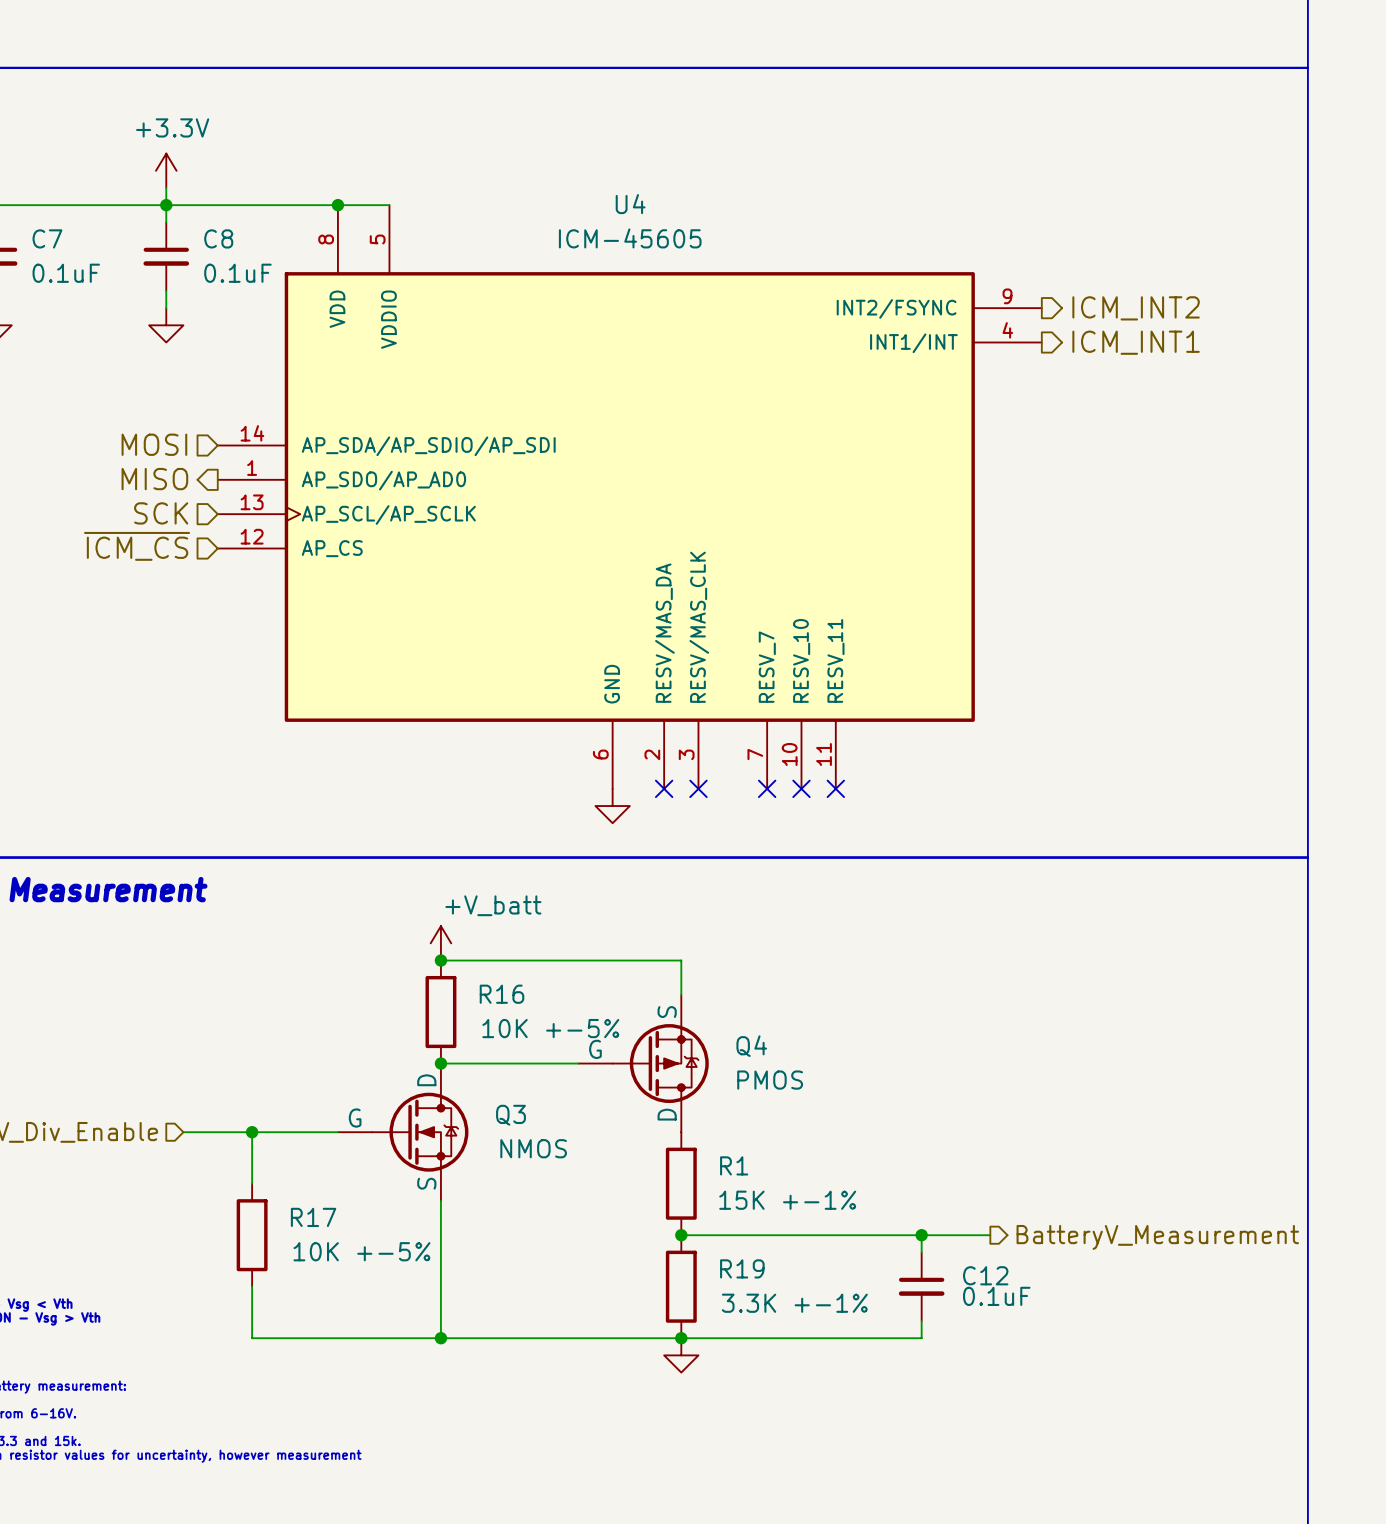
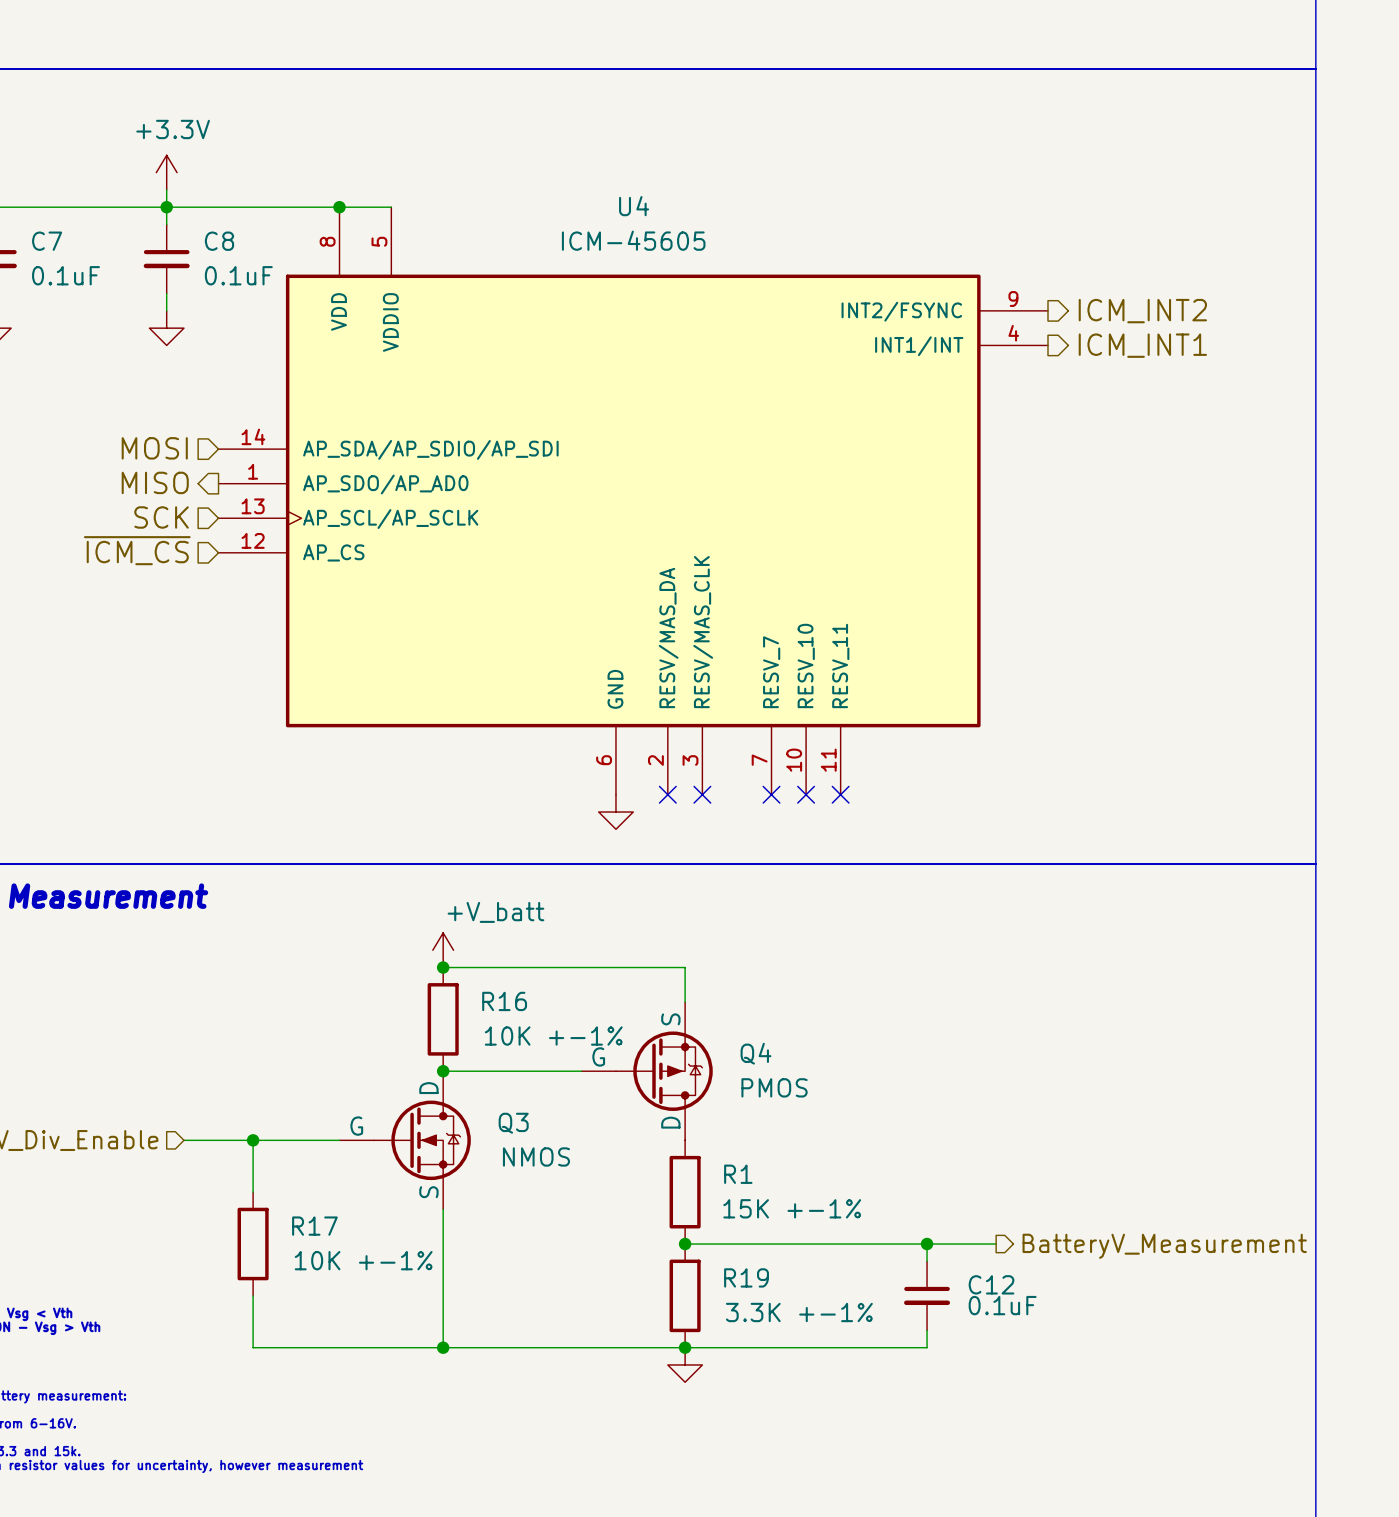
R16 value: 10K +-5% (550, 1028) -> 10K +-1% (553, 1036)
R17 value: 10K +-5% (361, 1251) -> 10K +-1% (363, 1260)

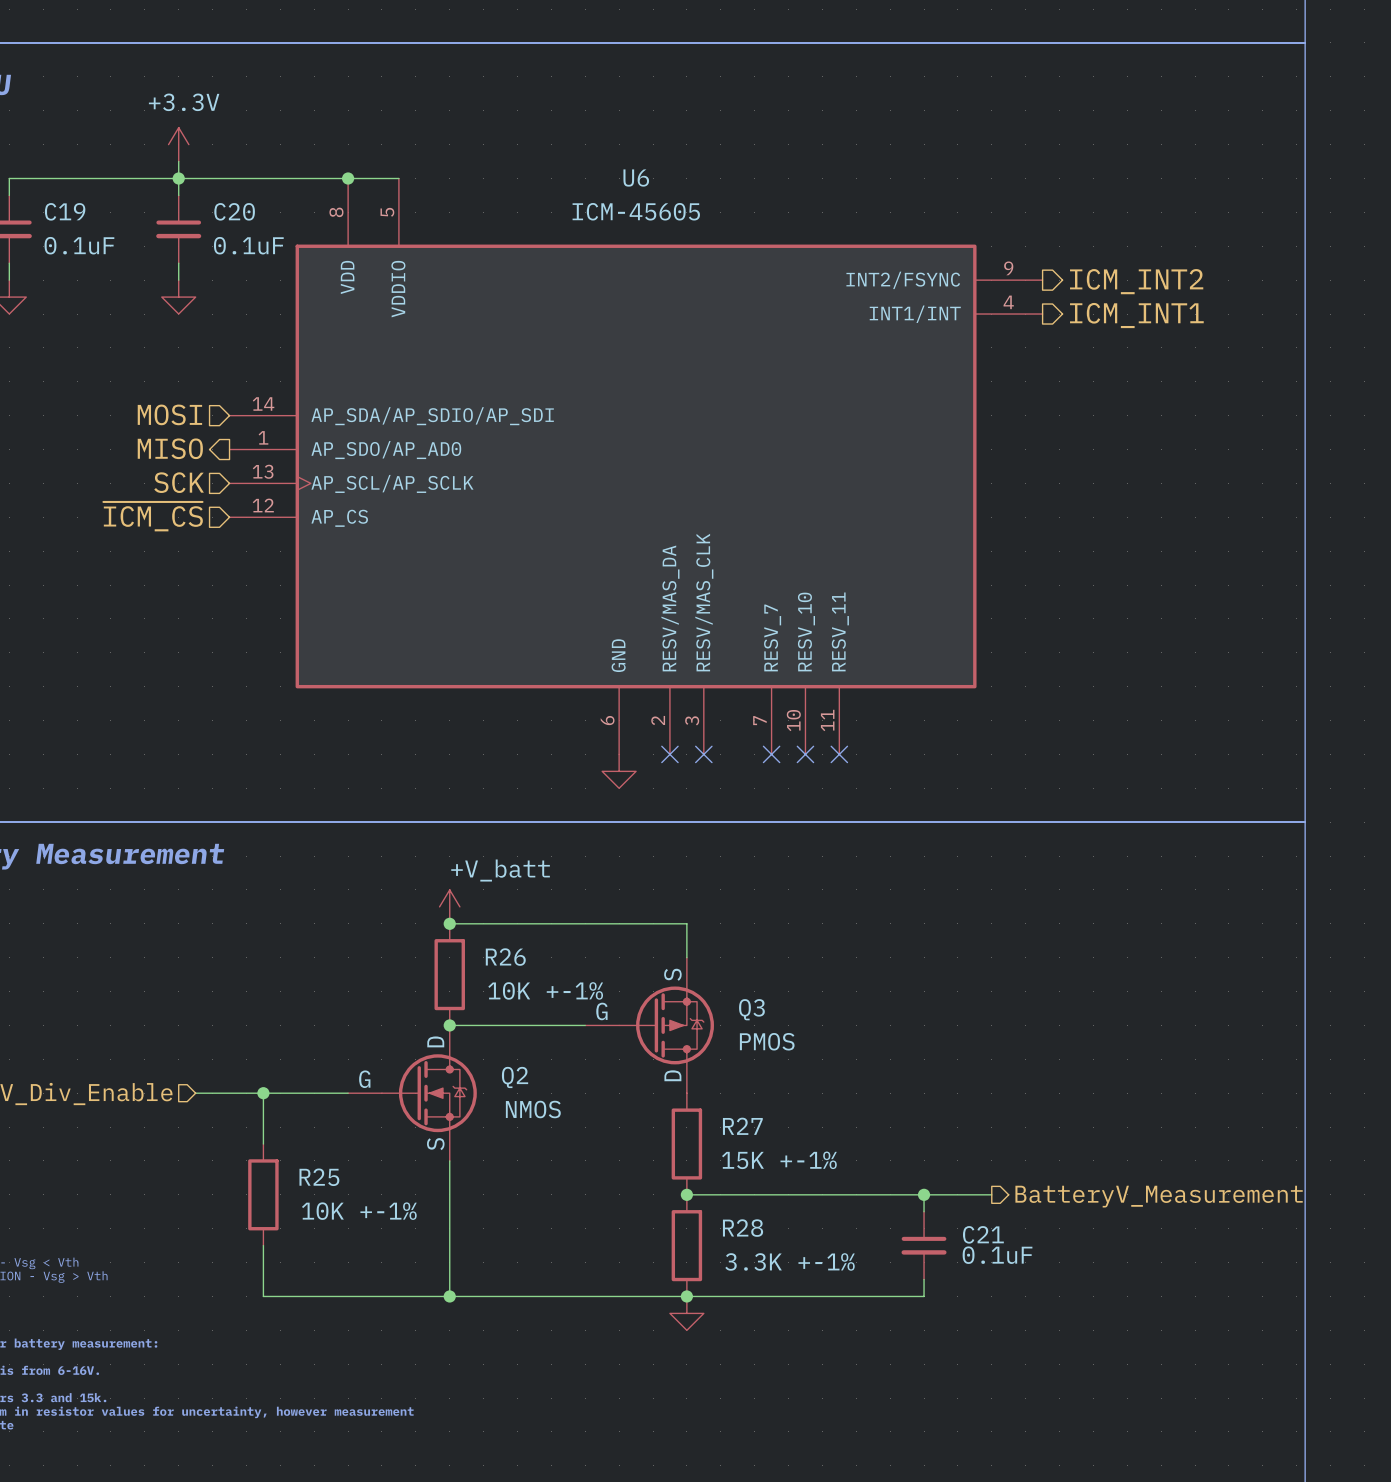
U4 name: U4 (634, 206) -> U6 (636, 178)
C7 name: C7 (47, 241) -> C19 (65, 211)
C8 name: C8 (219, 241) -> C20 (234, 211)
R16 name: R16 (504, 1001) -> R26 (505, 957)
Q4 name: Q4 (756, 1053) -> Q3 (751, 1009)
Q3 name: Q3 (513, 1123) -> Q2 (515, 1077)
R1 name: R1 (738, 1174) -> R27 (742, 1126)
R17 name: R17 (314, 1226) -> R25 (319, 1177)
R19 name: R19 (746, 1277) -> R28 (743, 1228)
C12 name: C12 (991, 1284) -> C21 (983, 1234)

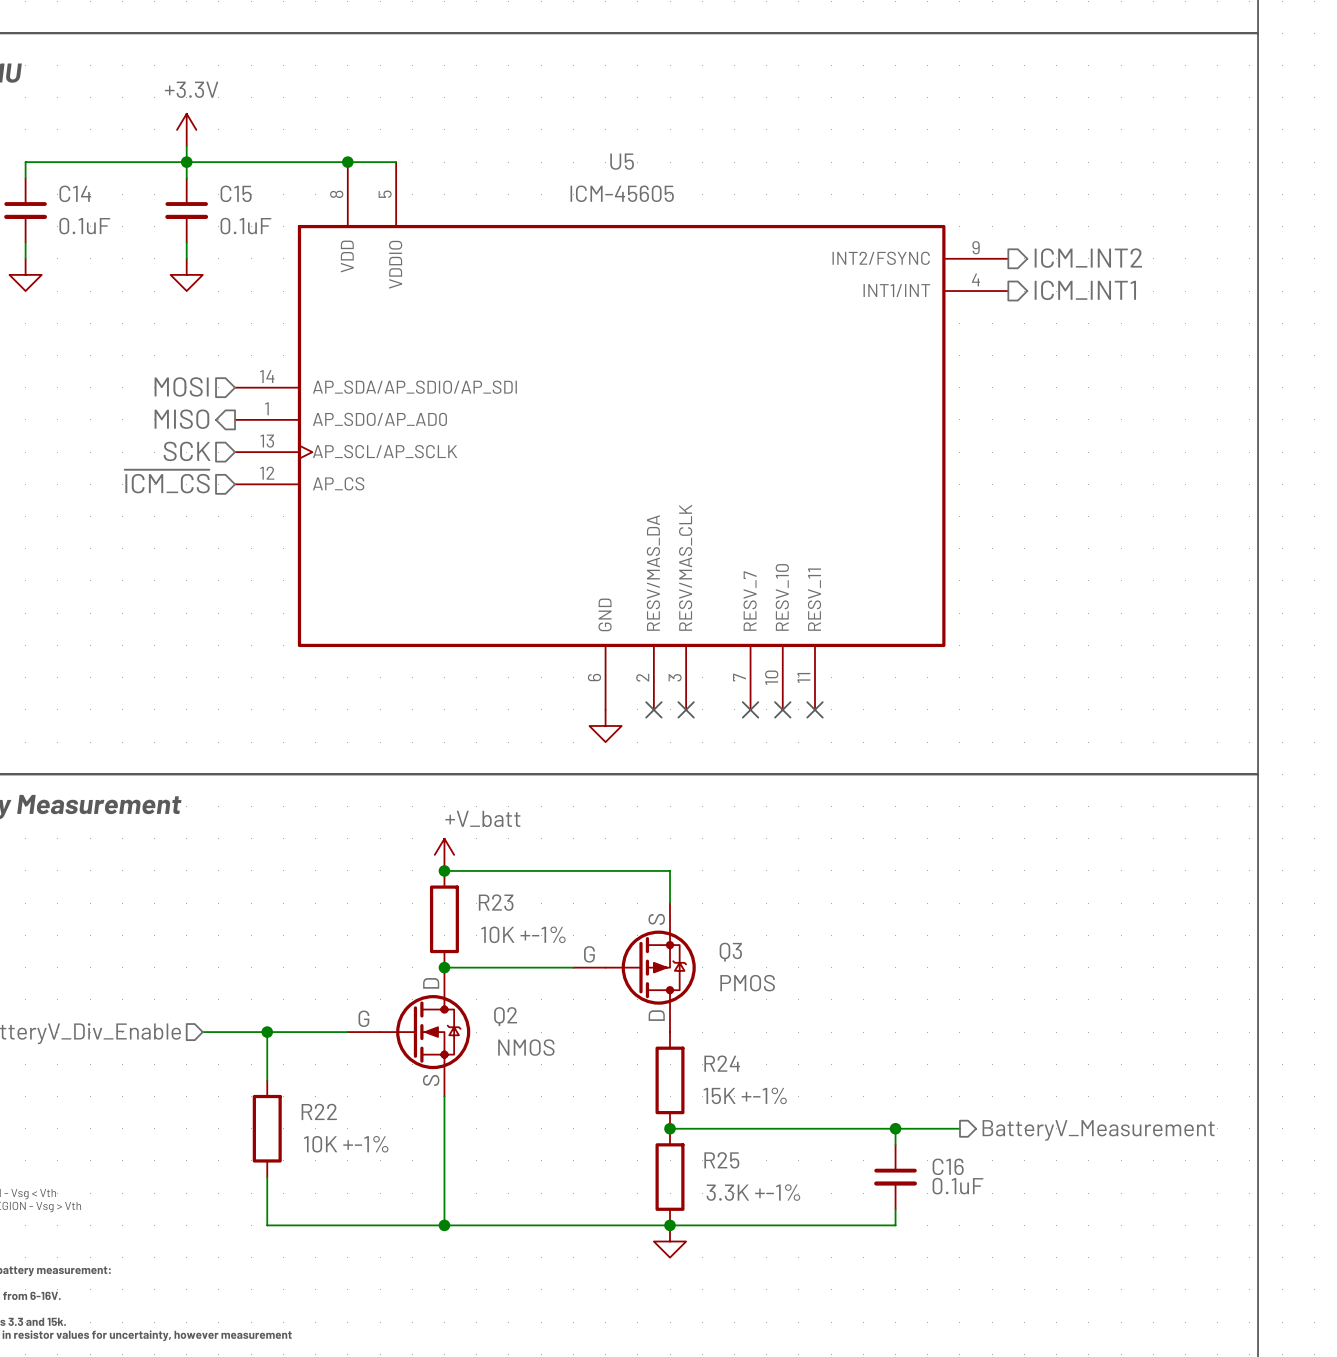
U6 name: U6 (636, 178) -> U5 (622, 161)
C19 name: C19 (65, 211) -> C14 (75, 193)
C20 name: C20 (234, 211) -> C15 (236, 193)
R26 name: R26 (505, 957) -> R23 (496, 902)
R27 name: R27 (742, 1126) -> R24 (722, 1063)
R25 name: R25 (319, 1177) -> R22 (319, 1111)
R28 name: R28 (743, 1228) -> R25 (721, 1160)
C21 name: C21 (983, 1234) -> C16 (948, 1166)

